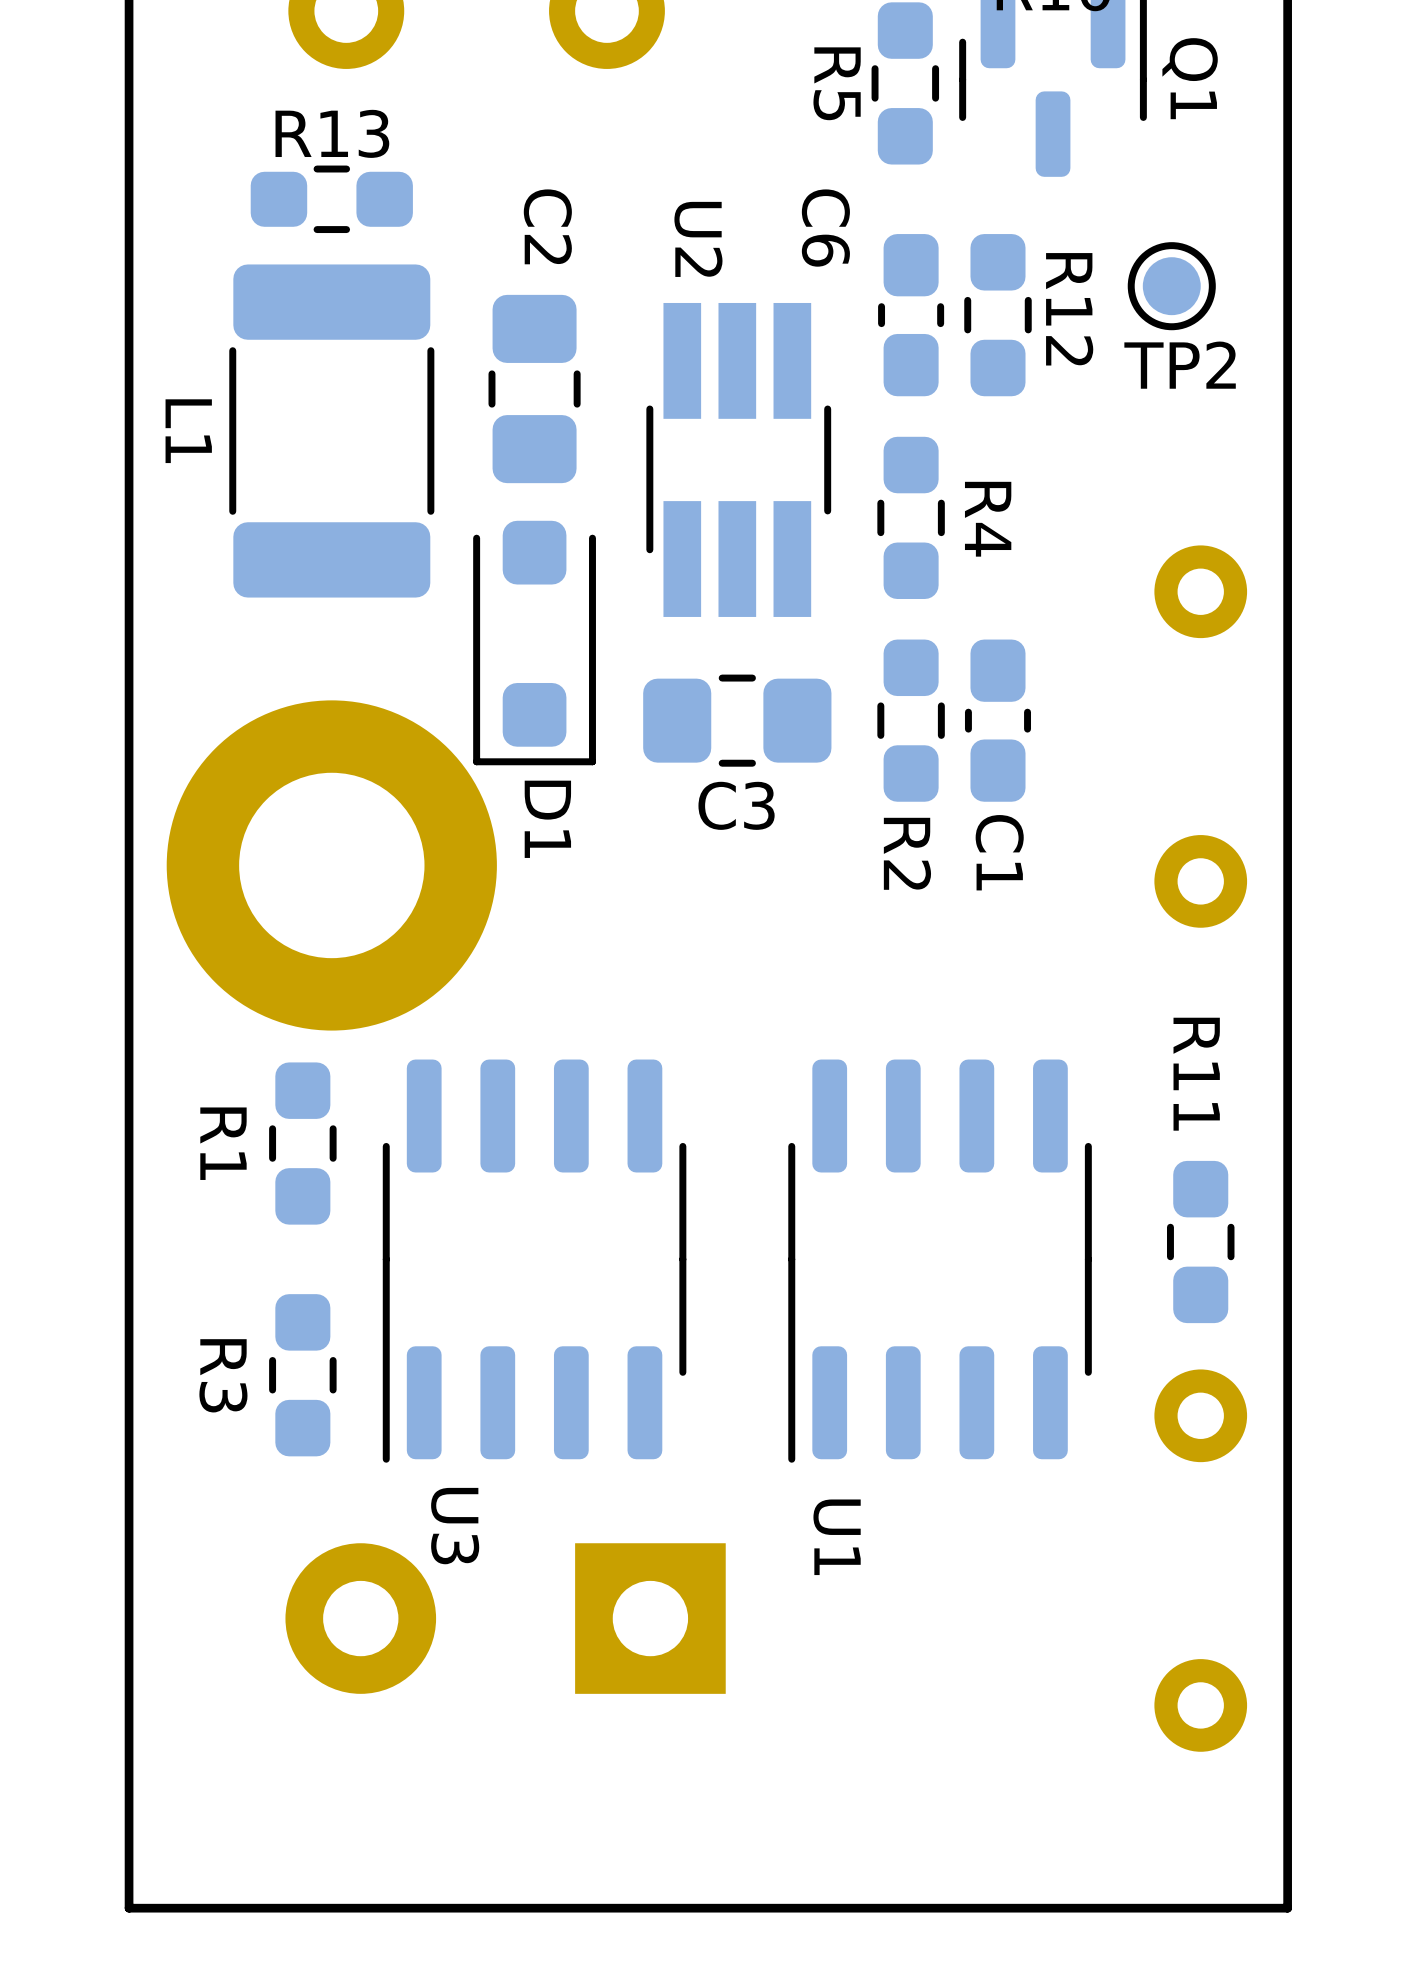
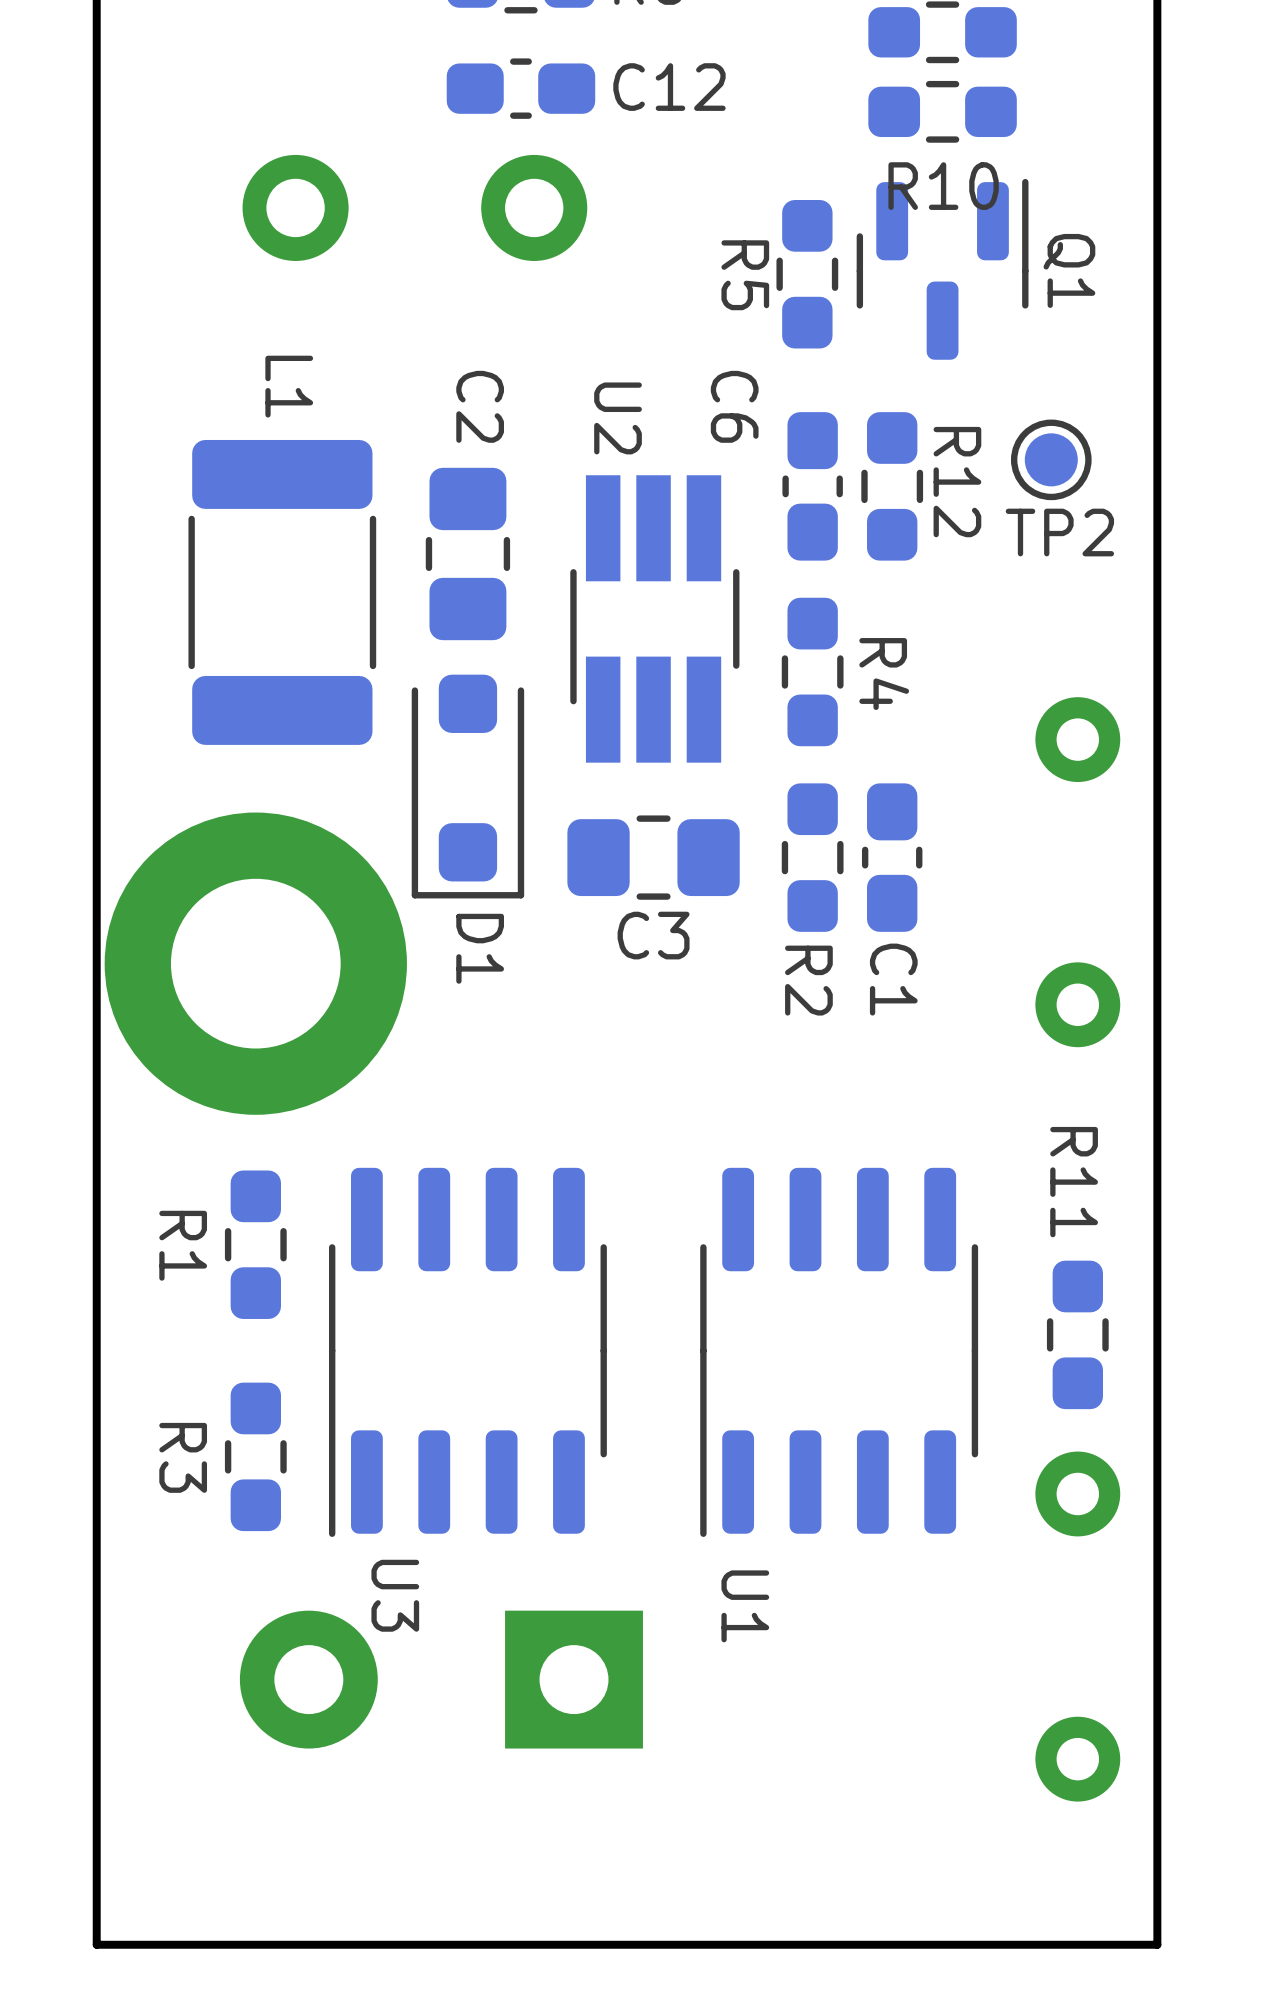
R13: (331, 199) -> none
L1 name position: L1 (188, 431) -> L1 (289, 386)
part position: (331, 865) -> (255, 963)

